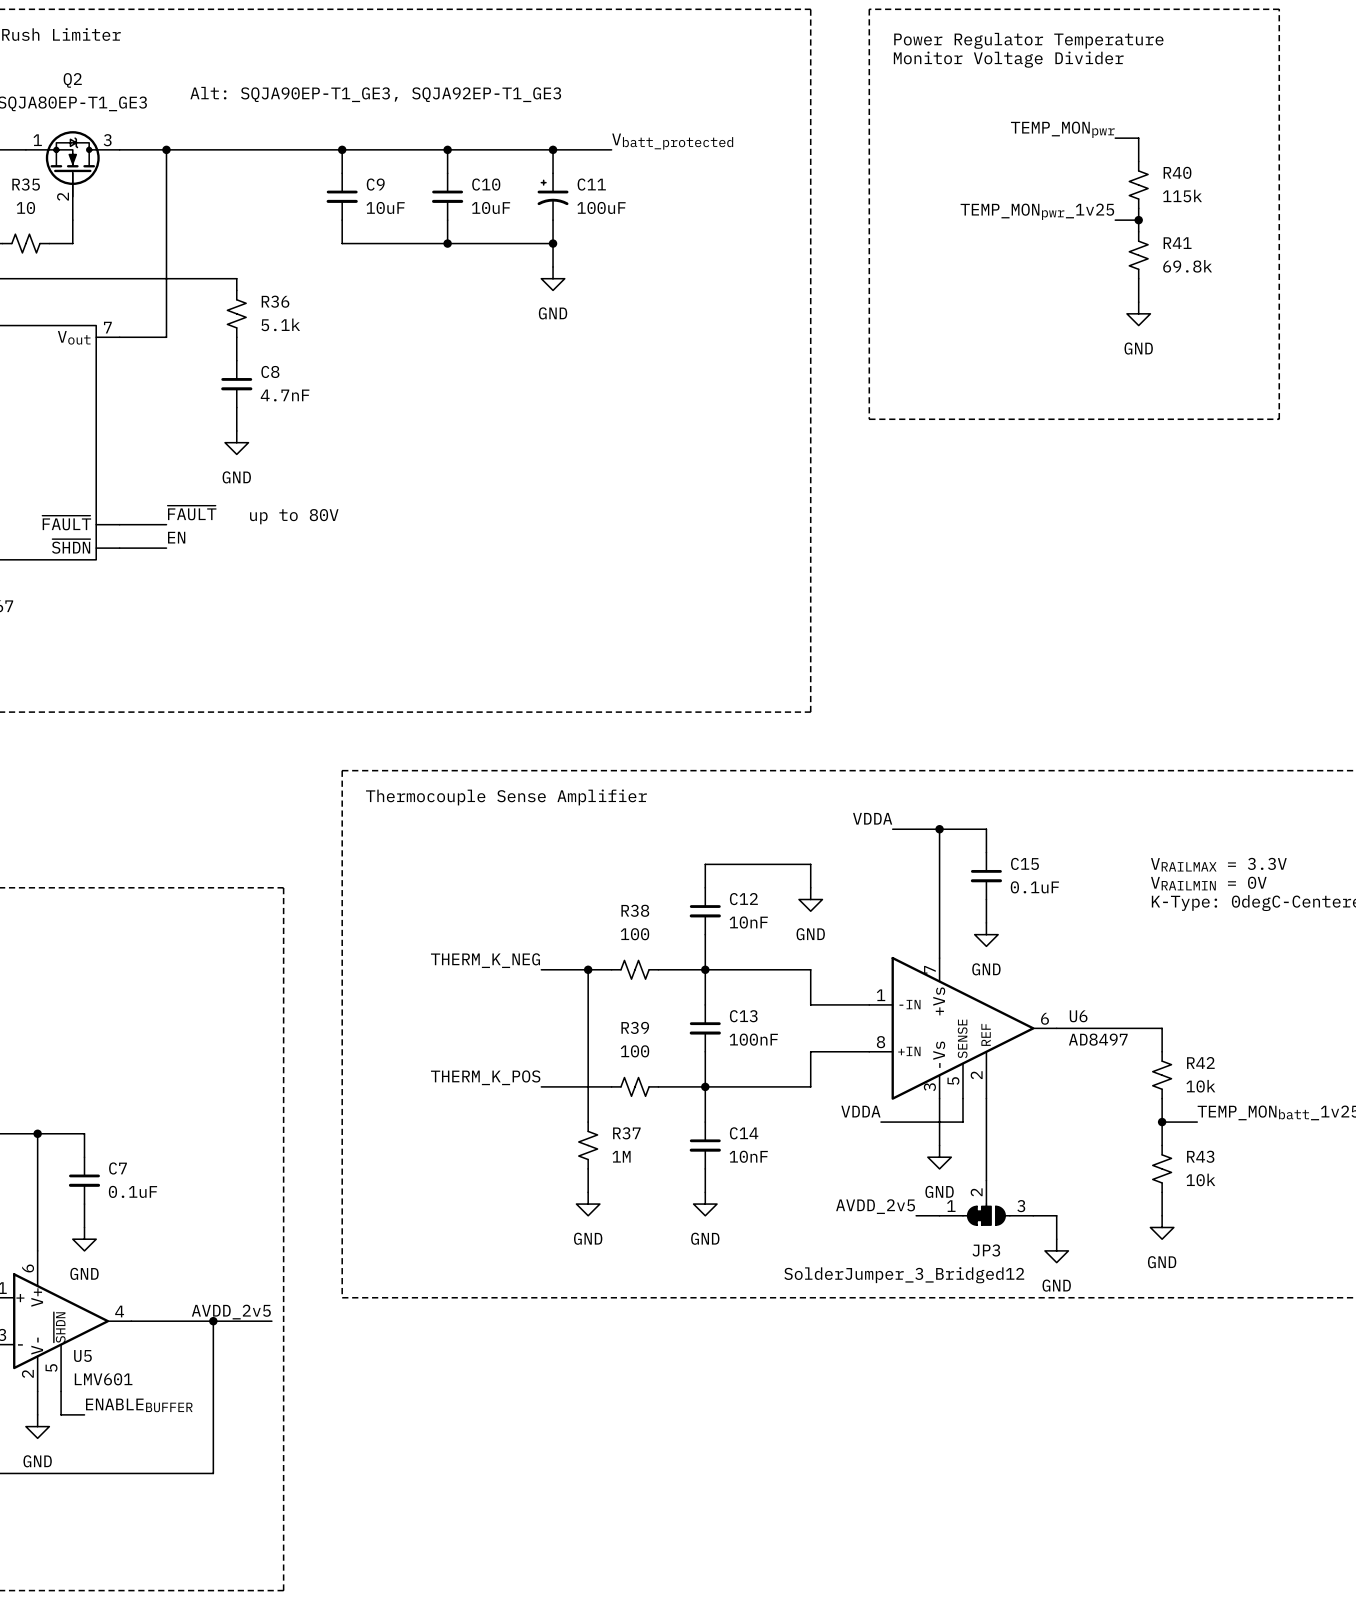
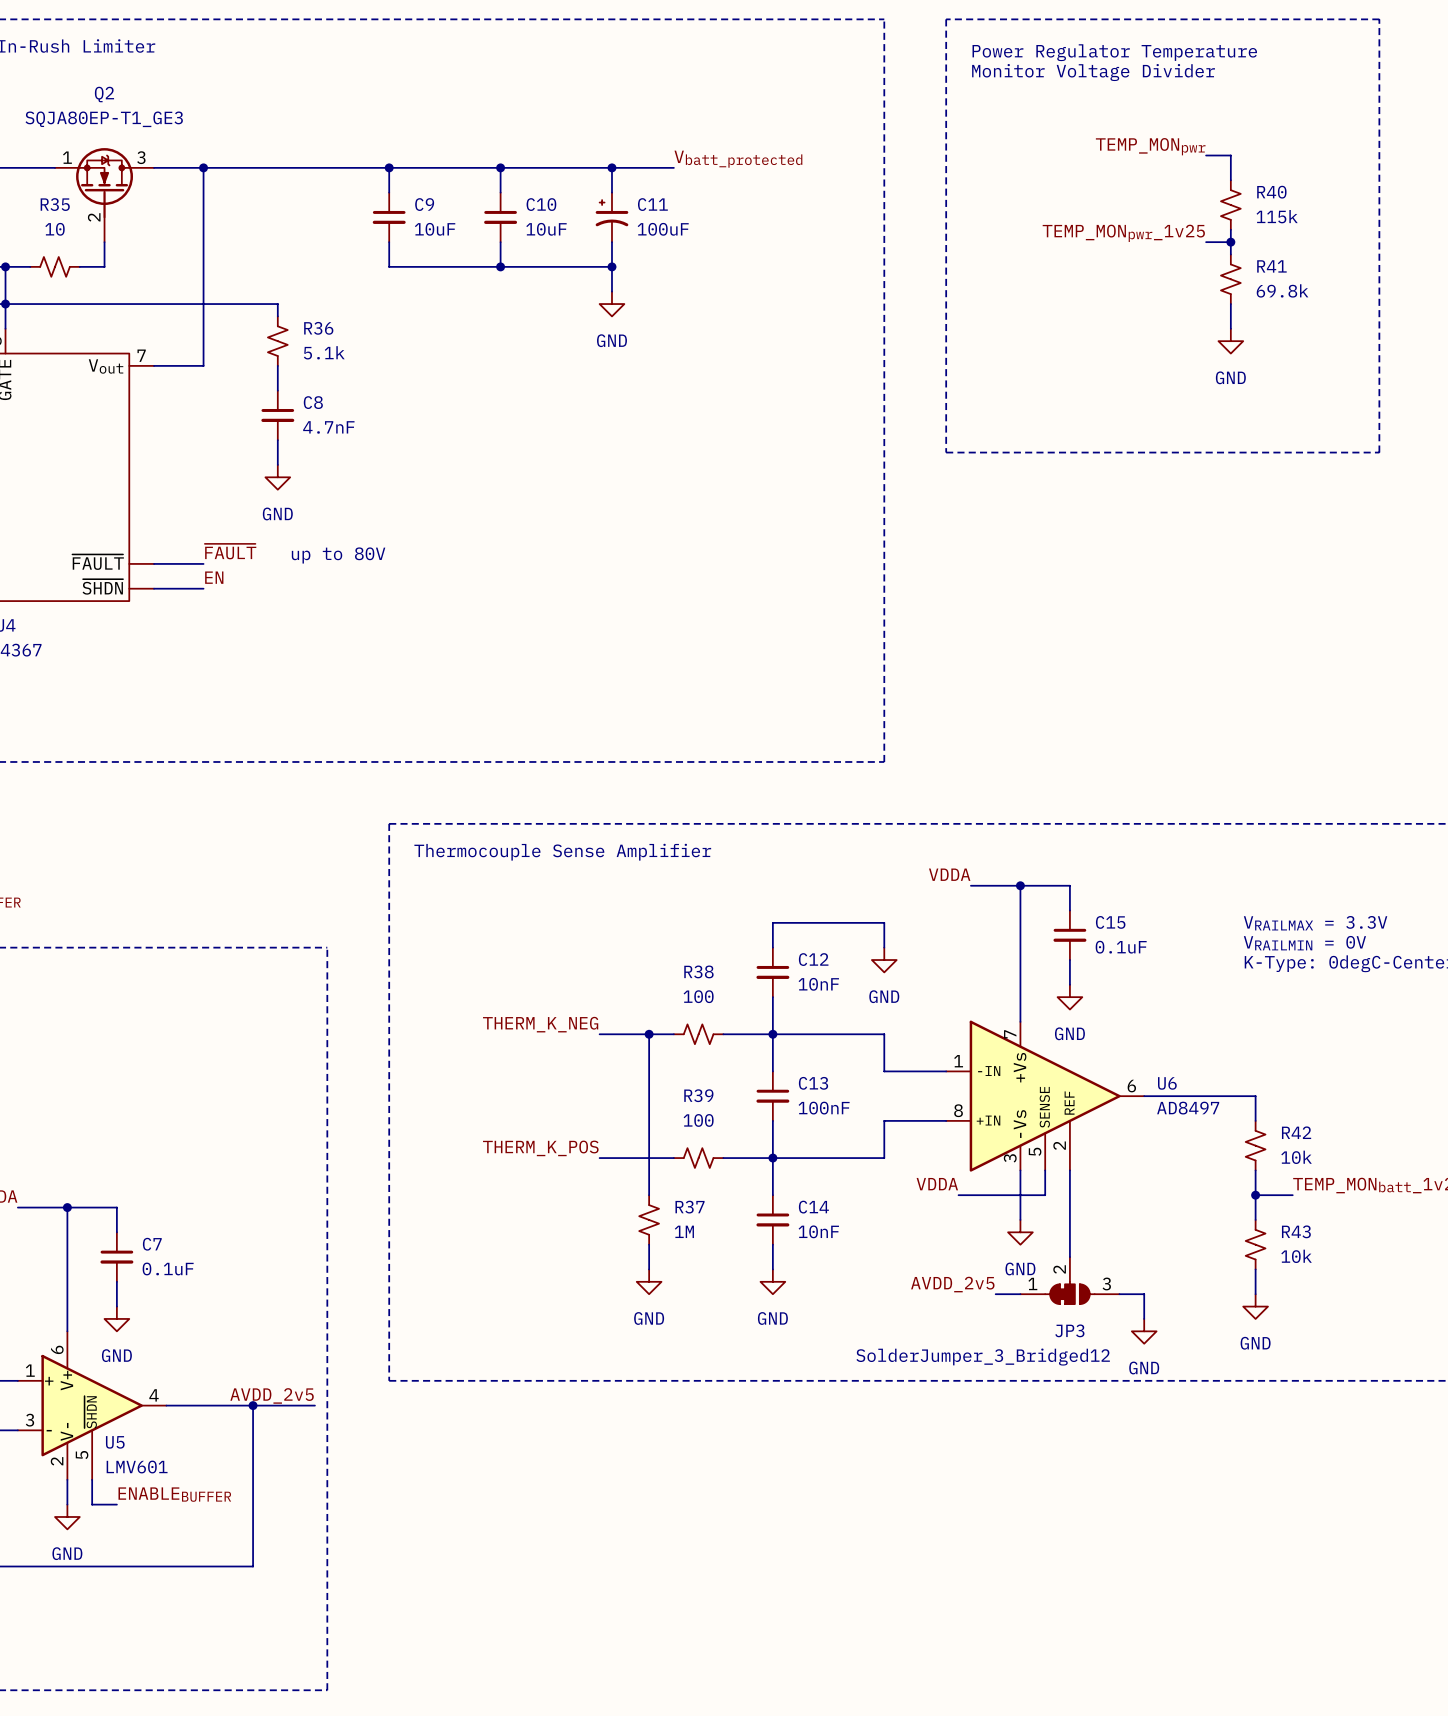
text: Alt: SQJA90EP-T1_GE3, SQJA92EP-T1_GE3 (375, 94) -> none

